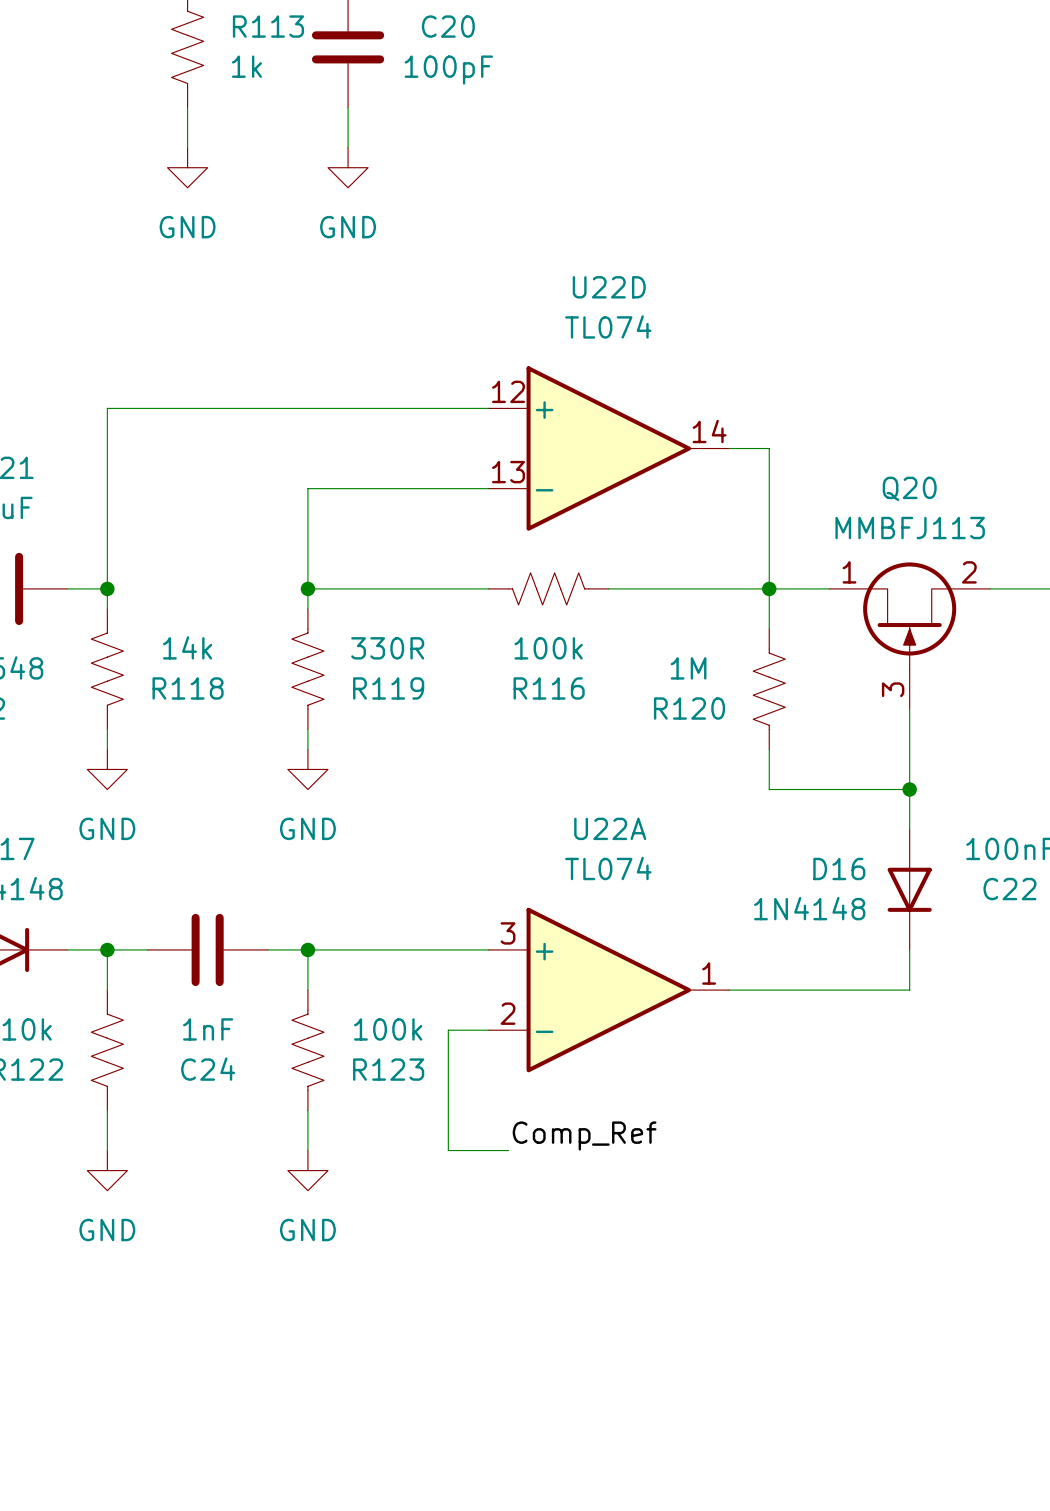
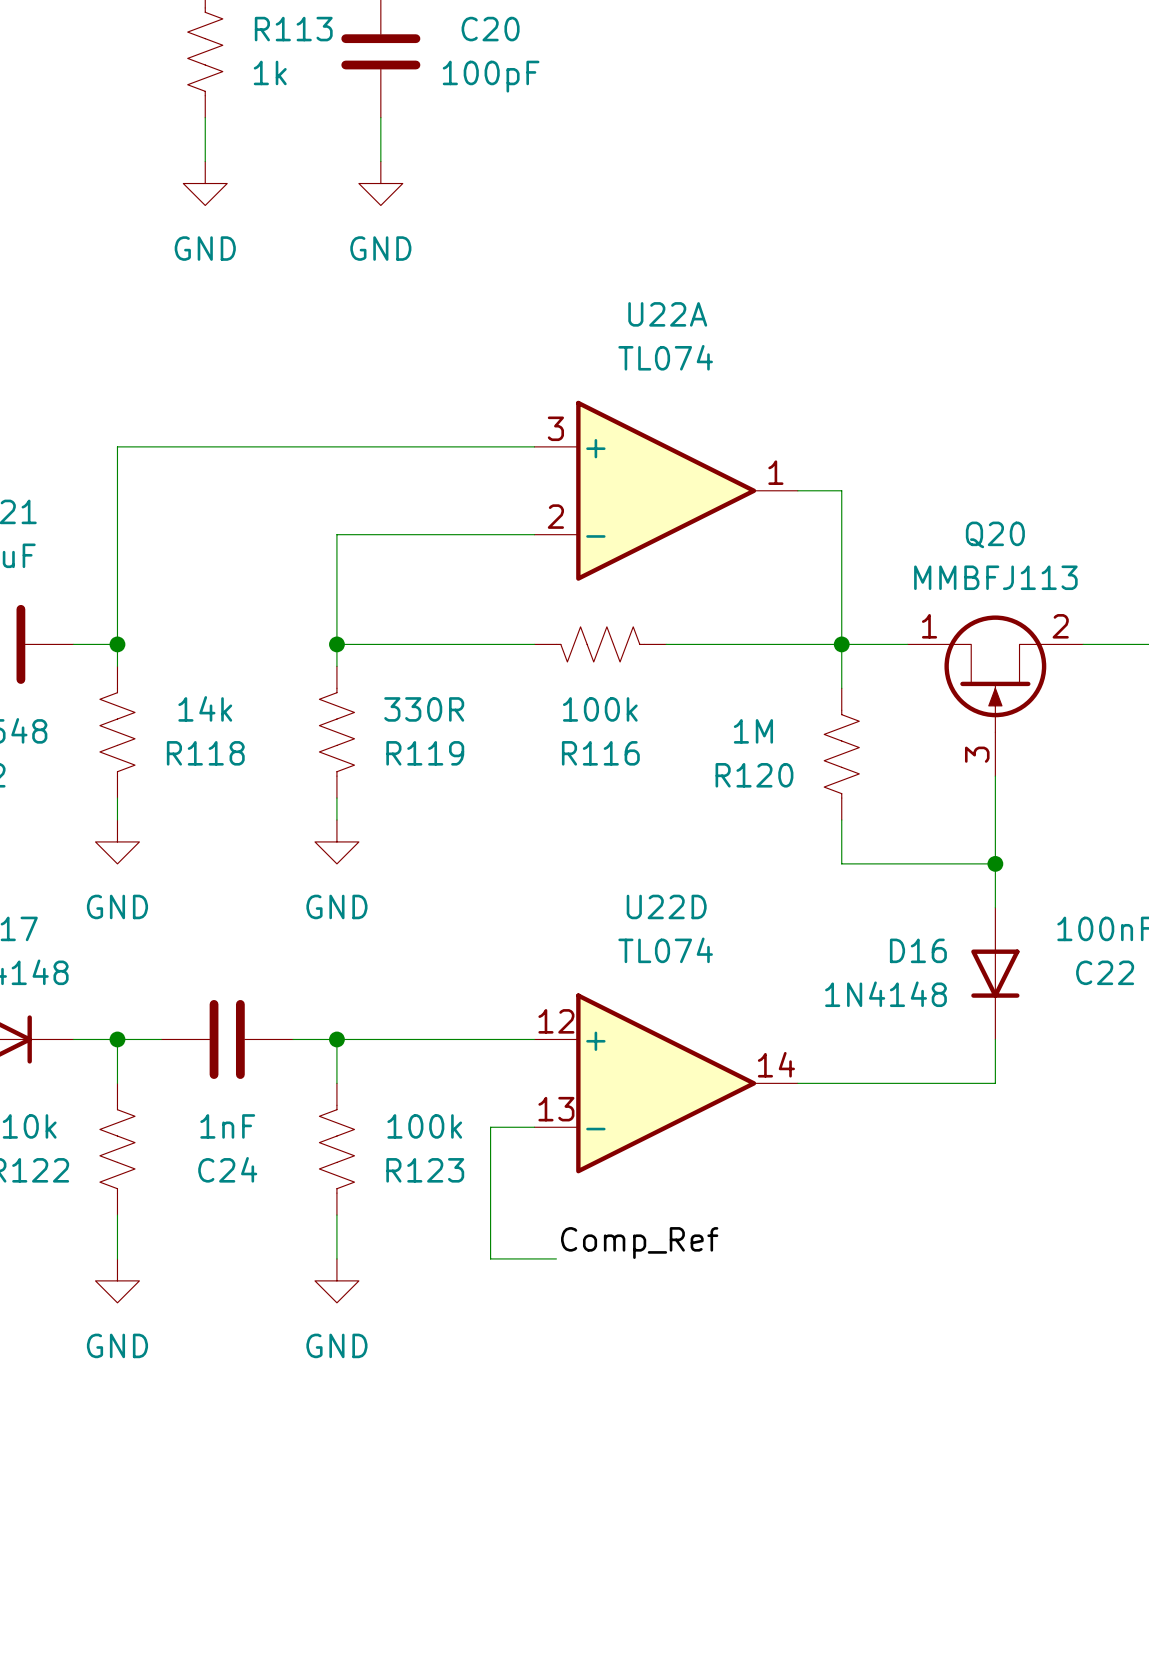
U22D position: (608, 448) -> (666, 1083)
U22A position: (608, 990) -> (666, 490)

